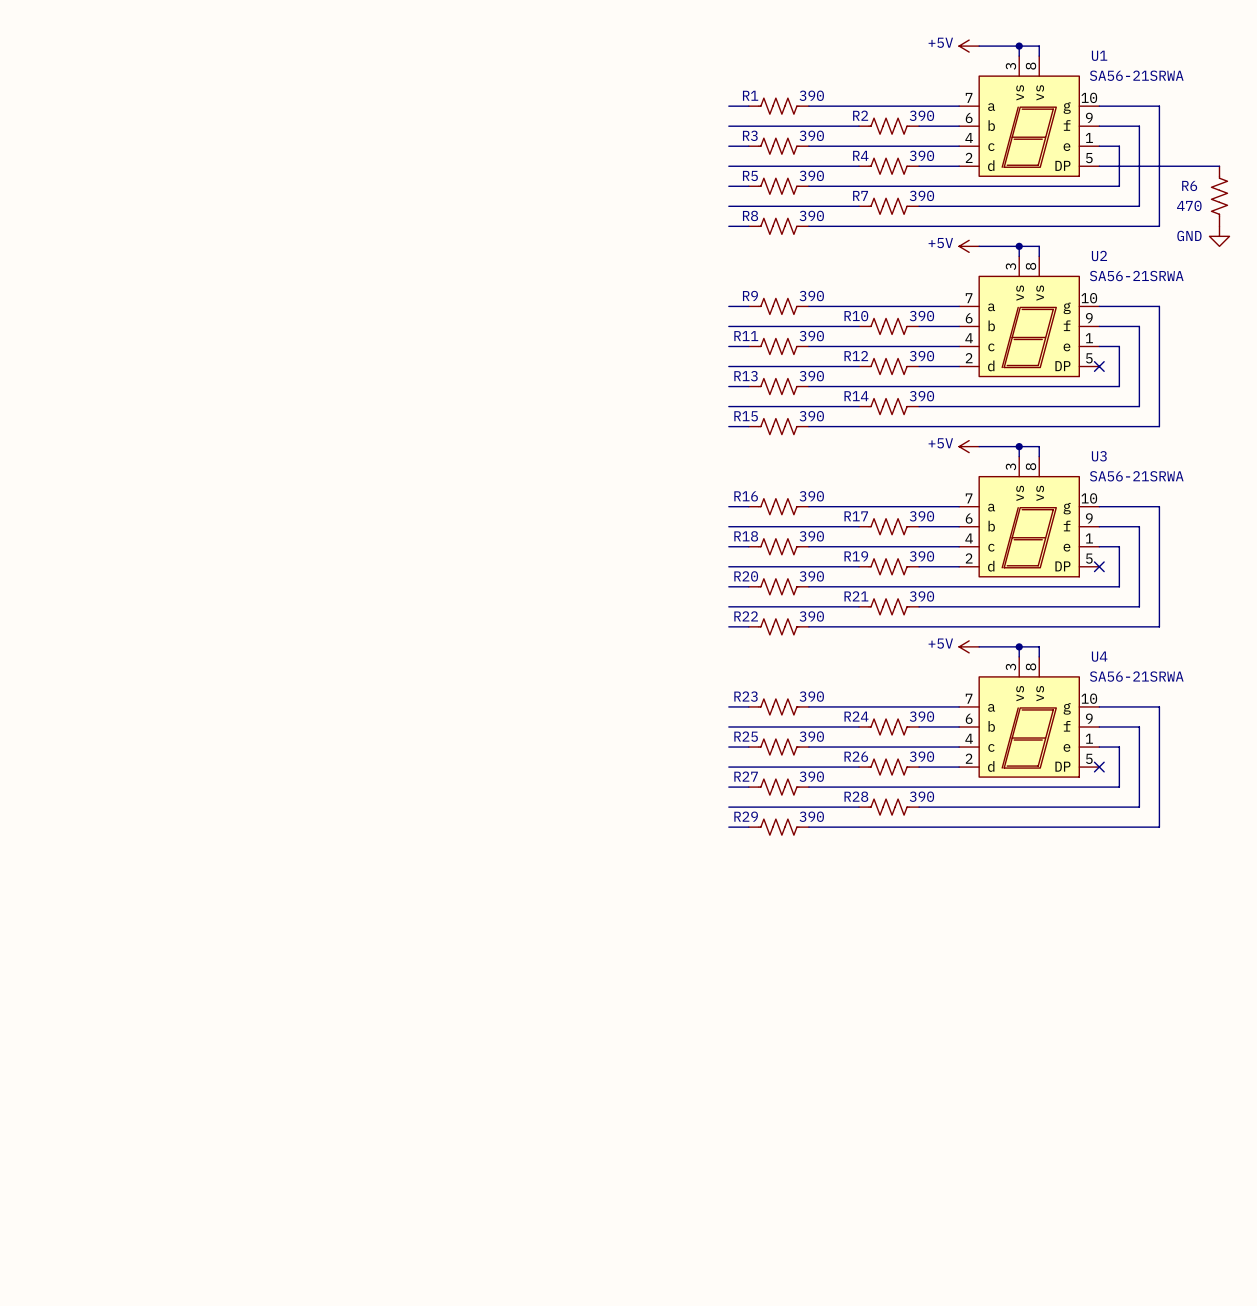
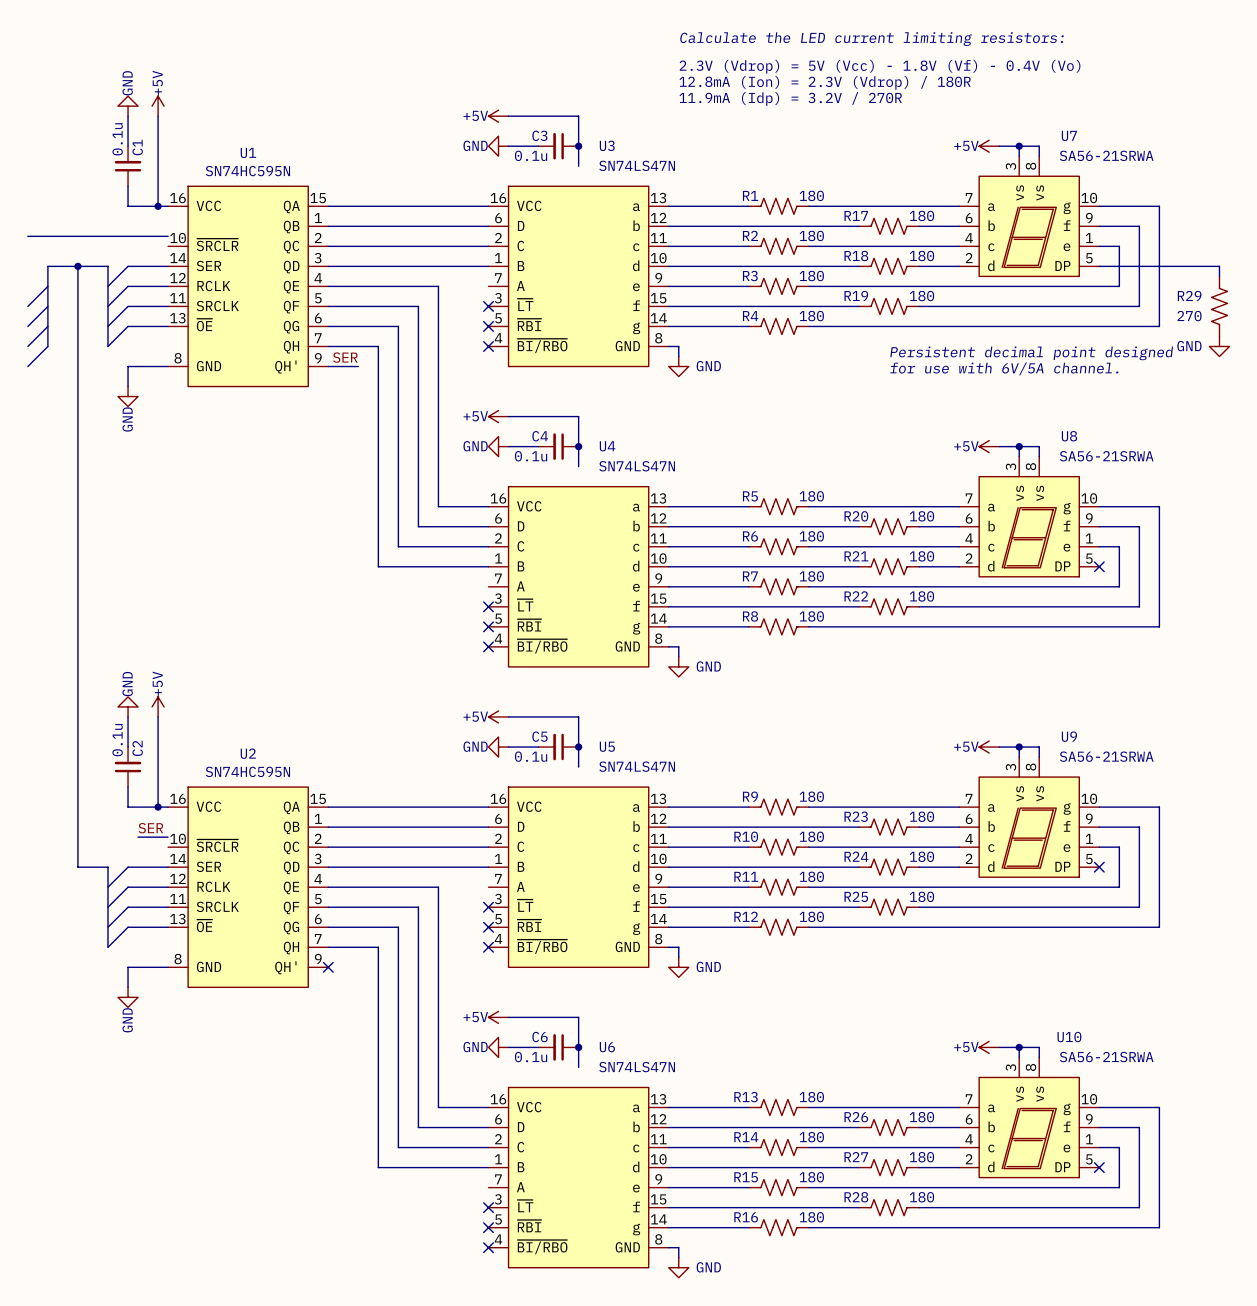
text: none -> Calculate the LED current limiting resistors: (871, 39)
power symbol: +5V (969, 46) -> none
wire: (979, 46) (1039, 46) (1039, 56) -> none
junction: (1019, 46) -> none
U1 name position: U1 (1099, 55) -> U1 (248, 152)
U1 symbol: [959, 56, 1100, 177] -> [168, 186, 329, 387]
text: none -> 2.3V (Vdrop) = 5V (Vcc) - 1.8V (Vf) - 0.4V (Vo) (880, 66)
U1 value: SA56-21SRWA (1136, 75) -> SN74HC595N (247, 171)
text: none -> 12.8mA (Ion) = 2.3V (Vdrop) / 180R (825, 82)
R1 value: 390 (811, 95) -> 180 (811, 195)
text: none -> 11.9mA (Idp) = 3.2V / 270R (790, 98)
power symbol: none -> GND (128, 106)
power symbol: none -> +5V (158, 106)
wire: (728, 106) (748, 106) -> none
R1 position: (778, 106) -> (778, 206)
wire: (808, 106) (959, 106) -> none
wire: (1099, 106) (1159, 106) (1159, 206) -> none
R2 value: 390 (921, 115) -> 180 (811, 235)
wire: none -> (128, 116) (128, 146)
wire: none -> (158, 116) (158, 206)
power symbol: none -> +5V (498, 116)
wire: none -> (508, 116) (578, 116) (578, 166)
wire: (728, 126) (859, 126) -> none
R2 position: (889, 126) -> (778, 246)
wire: (919, 126) (959, 126) -> none
wire: (1099, 126) (1139, 126) (1139, 206) -> (1159, 206) (1139, 206)
R3 value: 390 (811, 135) -> 180 (811, 276)
power symbol: none -> GND (498, 146)
wire: none -> (508, 146) (538, 146)
C3: none -> 0.1u (558, 146)
junction: none -> (578, 146)
wire: (728, 146) (748, 146) -> none
R3 position: (778, 146) -> (778, 286)
wire: (808, 146) (959, 146) -> (808, 246) (959, 246)
power symbol: none -> +5V (989, 146)
junction: none -> (1019, 146)
wire: (1099, 146) (1119, 146) (1119, 186) (808, 186) -> (1099, 246) (1119, 246) (1119, 286) (808, 286)
R4 value: 390 (921, 155) -> 180 (811, 316)
C1: none -> 0.1u (128, 166)
wire: (728, 166) (859, 166) -> none
R4 position: (889, 166) -> (778, 326)
wire: (919, 166) (959, 166) -> (919, 266) (959, 266)
wire: (1099, 166) (1219, 166) -> none
wire: none -> (128, 186) (128, 206) (168, 206)
wire: (728, 186) (748, 186) -> none
R5: 390 (778, 186) -> none
R6: 470 (1219, 196) -> none
junction: none -> (158, 206)
wire: none -> (328, 206) (488, 206)
wire: none -> (668, 206) (728, 206)
R7: 390 (889, 206) -> none
U7: none -> SA56-21SRWA (1029, 216)
wire: none -> (328, 226) (488, 226)
wire: none -> (668, 226) (728, 226)
R8: 390 (778, 226) -> none
R17: none -> 180 (889, 226)
wire: (1139, 226) (1159, 226) -> (1139, 226) (1139, 306)
wire: none -> (27, 236) (168, 236)
power symbol position: GND (1219, 236) -> GND (1219, 346)
wire: none -> (328, 246) (488, 246)
wire: none -> (668, 246) (748, 246)
power symbol: +5V (969, 246) -> none
junction: (1019, 246) -> none
U2 name position: U2 (1099, 255) -> U2 (248, 753)
U2 symbol: [959, 256, 1100, 377] -> [168, 787, 329, 988]
bus: none -> (77, 266) (77, 867) (107, 867) (107, 947)
junction: none -> (77, 266)
wire: none -> (168, 266) (128, 266) (107, 286)
wire: none -> (328, 266) (488, 266)
wire: none -> (668, 266) (859, 266)
R18: none -> 180 (889, 266)
wire: none -> (1099, 266) (1219, 266) (1219, 276)
U3: none -> SN74LS47N (578, 276)
U2 value: SA56-21SRWA (1136, 276) -> SN74HC595N (247, 771)
wire: none -> (47, 286) (27, 306)
wire: none -> (168, 286) (128, 286) (107, 306)
wire: none -> (328, 286) (438, 286) (438, 506) (488, 506)
wire: none -> (668, 286) (748, 286)
R9 value: 390 (811, 296) -> 180 (811, 796)
wire: none -> (47, 306) (27, 326)
wire: none -> (168, 306) (128, 306) (107, 326)
wire: none -> (328, 306) (418, 306) (418, 526) (488, 526)
no-connect mark: none -> (488, 306)
wire: none -> (668, 306) (728, 306)
R9 position: (778, 306) -> (778, 807)
R19: none -> 180 (889, 306)
wire: (1139, 306) (1159, 306) -> (1159, 226) (1159, 306)
R10 value: 390 (921, 316) -> 180 (811, 836)
wire: none -> (47, 326) (27, 346)
wire: none -> (168, 326) (128, 326) (107, 346)
wire: none -> (328, 326) (398, 326) (398, 546) (488, 546)
no-connect mark: none -> (488, 326)
wire: none -> (668, 326) (728, 326)
R10 position: (889, 326) -> (778, 847)
wire: (1139, 326) (1139, 406) (919, 406) -> (1139, 326) (1159, 326)
wire: (1159, 326) (1159, 426) (808, 426) -> none
R11 value: 390 (811, 336) -> 180 (811, 876)
wire: none -> (47, 346) (27, 366)
bus: none -> (47, 346) (47, 266) (107, 266) (107, 346)
wire: none -> (328, 346) (378, 346) (378, 566) (488, 566)
no-connect mark: none -> (488, 346)
wire: none -> (668, 346) (678, 346) (678, 356)
wire: (728, 346) (748, 346) -> none
R11 position: (778, 346) -> (778, 887)
wire: (808, 346) (959, 346) -> none
wire: (1099, 346) (1119, 346) (1119, 386) (808, 386) -> none
text: none -> Persistent decimal point designed (1031, 353)
R12 value: 390 (921, 356) -> 180 (811, 916)
label: none -> SER (345, 357)
wire: none -> (168, 366) (128, 366) (128, 386)
wire: none -> (328, 366) (358, 366)
power symbol: none -> GND (678, 366)
wire: (728, 366) (859, 366) -> none
R12 position: (889, 366) -> (778, 927)
wire: (919, 366) (959, 366) -> none
no-connect mark: (1099, 366) -> none
text: none -> for use with 6V/5A channel. (1004, 368)
R13 value: 390 (811, 376) -> 180 (811, 1097)
wire: (728, 386) (748, 386) -> none
R13 position: (778, 386) -> (778, 1107)
power symbol: none -> GND (128, 396)
R14 value: 390 (921, 396) -> 180 (811, 1137)
wire: (728, 406) (859, 406) -> none
R14 position: (889, 406) -> (778, 1147)
power symbol: none -> +5V (498, 416)
wire: none -> (508, 416) (578, 416) (578, 466)
R15 value: 390 (811, 416) -> 180 (811, 1177)
wire: (728, 426) (748, 426) -> none
R15 position: (778, 426) -> (778, 1187)
power symbol text position: +5V (940, 443) -> +5V (966, 446)
power symbol: none -> GND (498, 446)
wire: none -> (508, 446) (538, 446)
C4: none -> 0.1u (558, 446)
junction: none -> (578, 446)
power symbol position: +5V (969, 446) -> +5V (989, 446)
U3 name: U3 (1099, 456) -> U8 (1069, 436)
U3 value position: SA56-21SRWA (1136, 476) -> SA56-21SRWA (1106, 456)
R16 name: R16 (746, 496) -> R5 (750, 496)
R16 value: 390 (811, 496) -> 180 (811, 496)
wire: none -> (668, 506) (728, 506)
R17 name: R17 (856, 516) -> R20 (856, 516)
R17 value: 390 (921, 516) -> 180 (921, 516)
wire: none -> (668, 526) (728, 526)
R18 name: R18 (746, 536) -> R6 (750, 536)
R18 value: 390 (811, 536) -> 180 (811, 536)
wire: none -> (668, 546) (728, 546)
R19 name: R19 (856, 556) -> R21 (856, 556)
R19 value: 390 (921, 556) -> 180 (921, 556)
wire: none -> (668, 566) (728, 566)
R20 name: R20 (746, 576) -> R7 (750, 576)
R20 value: 390 (811, 576) -> 180 (811, 576)
wire: none -> (668, 586) (728, 586)
R21 name: R21 (856, 596) -> R22 (856, 596)
R21 value: 390 (921, 596) -> 180 (921, 596)
no-connect mark: none -> (488, 606)
wire: none -> (668, 606) (728, 606)
R22 name: R22 (746, 616) -> R8 (750, 616)
R22 value: 390 (811, 616) -> 180 (811, 616)
no-connect mark: none -> (488, 626)
wire: none -> (668, 626) (728, 626)
no-connect mark: none -> (488, 646)
wire: none -> (668, 646) (678, 646) (678, 656)
power symbol: +5V (969, 646) -> none
wire: (979, 646) (1039, 646) (1039, 656) -> none
junction: (1019, 646) -> none
U4 symbol: [959, 656, 1100, 778] -> [488, 486, 669, 667]
U4 name position: U4 (1099, 656) -> U4 (607, 446)
power symbol: none -> GND (678, 666)
U4 value: SA56-21SRWA (1136, 676) -> SN74LS47N (637, 466)
R23 value: 390 (811, 696) -> 180 (921, 816)
power symbol: none -> GND (128, 706)
power symbol: none -> +5V (158, 706)
wire: (728, 706) (748, 706) -> none
R23 position: (778, 706) -> (889, 827)
wire: (808, 706) (959, 706) -> none
wire: (1099, 706) (1159, 706) (1159, 807) -> none
wire: none -> (128, 716) (128, 747)
wire: none -> (158, 716) (158, 807)
power symbol: none -> +5V (498, 716)
wire: none -> (508, 716) (578, 716) (578, 767)
R24 value: 390 (921, 716) -> 180 (921, 856)
wire: (728, 726) (859, 726) -> none
R24 position: (889, 726) -> (889, 867)
wire: (919, 726) (959, 726) -> none
wire: (1099, 726) (1139, 726) (1139, 807) -> (1159, 807) (1139, 807)
R25 value: 390 (811, 736) -> 180 (921, 896)
power symbol: none -> GND (498, 747)
wire: none -> (508, 747) (538, 747)
C5: none -> 0.1u (558, 747)
junction: none -> (578, 747)
wire: (728, 747) (748, 747) -> none
R25 position: (778, 747) -> (889, 907)
wire: (808, 747) (959, 747) -> (808, 847) (959, 847)
power symbol: none -> +5V (989, 747)
junction: none -> (1019, 747)
wire: (1099, 747) (1119, 747) (1119, 787) (808, 787) -> (1099, 847) (1119, 847) (1119, 887) (808, 887)
R26 value: 390 (921, 756) -> 180 (921, 1117)
C2: none -> 0.1u (128, 767)
wire: (728, 767) (859, 767) -> none
R26 position: (889, 767) -> (889, 1127)
wire: (919, 767) (959, 767) -> (919, 867) (959, 867)
no-connect mark: (1099, 767) -> none
R27 value: 390 (811, 776) -> 180 (921, 1157)
wire: none -> (128, 787) (128, 807) (168, 807)
wire: (728, 787) (748, 787) -> none
R27 position: (778, 787) -> (889, 1167)
R28 value: 390 (921, 796) -> 180 (921, 1197)
junction: none -> (158, 807)
wire: none -> (328, 807) (488, 807)
wire: none -> (668, 807) (728, 807)
R28 position: (889, 807) -> (889, 1207)
R29 value: 390 (811, 816) -> 270 (1189, 316)
U9: none -> SA56-21SRWA (1029, 817)
wire: none -> (328, 827) (488, 827)
wire: none -> (668, 827) (728, 827)
R29 rotation: 0° (778, 827) -> 90° clockwise (1219, 306)
R29 position: (778, 827) -> (1219, 306)
wire: (1139, 827) (1159, 827) -> (1139, 827) (1139, 907) (919, 907)
wire: none -> (1159, 827) (1159, 927) (808, 927)
label: none -> SER (150, 828)
wire: none -> (138, 837) (168, 837)
wire: none -> (328, 847) (488, 847)
wire: none -> (668, 847) (748, 847)
wire: none -> (168, 867) (128, 867) (107, 887)
wire: none -> (328, 867) (488, 867)
wire: none -> (668, 867) (859, 867)
no-connect mark: none -> (1099, 867)
U5: none -> SN74LS47N (578, 877)
wire: none -> (168, 887) (128, 887) (107, 907)
wire: none -> (328, 887) (438, 887) (438, 1107) (488, 1107)
wire: none -> (668, 887) (748, 887)
wire: none -> (168, 907) (128, 907) (107, 927)
wire: none -> (328, 907) (418, 907) (418, 1127) (488, 1127)
no-connect mark: none -> (488, 907)
wire: none -> (668, 907) (859, 907)
wire: none -> (168, 927) (128, 927) (107, 947)
wire: none -> (328, 927) (398, 927) (398, 1147) (488, 1147)
no-connect mark: none -> (488, 927)
wire: none -> (668, 927) (748, 927)
wire: none -> (328, 947) (378, 947) (378, 1167) (488, 1167)
no-connect mark: none -> (488, 947)
wire: none -> (668, 947) (678, 947) (678, 957)
wire: none -> (168, 967) (128, 967) (128, 987)
no-connect mark: none -> (328, 967)
power symbol: none -> GND (678, 967)
power symbol: none -> GND (128, 997)
power symbol: none -> +5V (498, 1017)
wire: none -> (508, 1017) (578, 1017) (578, 1067)
power symbol: none -> GND (498, 1047)
wire: none -> (508, 1047) (538, 1047)
C6: none -> 0.1u (558, 1047)
junction: none -> (578, 1047)
power symbol: none -> +5V (989, 1047)
wire: none -> (999, 1047) (1039, 1047) (1039, 1057)
wire: none -> (1019, 1047) (1019, 1057)
junction: none -> (1019, 1047)
wire: none -> (668, 1107) (748, 1107)
wire: none -> (808, 1107) (959, 1107)
wire: none -> (1099, 1107) (1159, 1107) (1159, 1227) (808, 1227)
U10: none -> SA56-21SRWA (1029, 1117)
wire: none -> (668, 1127) (859, 1127)
wire: none -> (919, 1127) (959, 1127)
wire: none -> (1099, 1127) (1139, 1127) (1139, 1207) (919, 1207)
wire: none -> (668, 1147) (748, 1147)
wire: none -> (808, 1147) (959, 1147)
wire: none -> (1099, 1147) (1119, 1147) (1119, 1187) (808, 1187)
wire: none -> (668, 1167) (859, 1167)
wire: none -> (919, 1167) (959, 1167)
no-connect mark: none -> (1099, 1167)
U6: none -> SN74LS47N (578, 1177)
wire: none -> (668, 1187) (748, 1187)
no-connect mark: none -> (488, 1207)
wire: none -> (668, 1207) (859, 1207)
no-connect mark: none -> (488, 1227)
wire: none -> (668, 1227) (748, 1227)
R16: none -> 180 (778, 1227)
no-connect mark: none -> (488, 1247)
wire: none -> (668, 1247) (678, 1247) (678, 1257)
power symbol: none -> GND (678, 1267)

